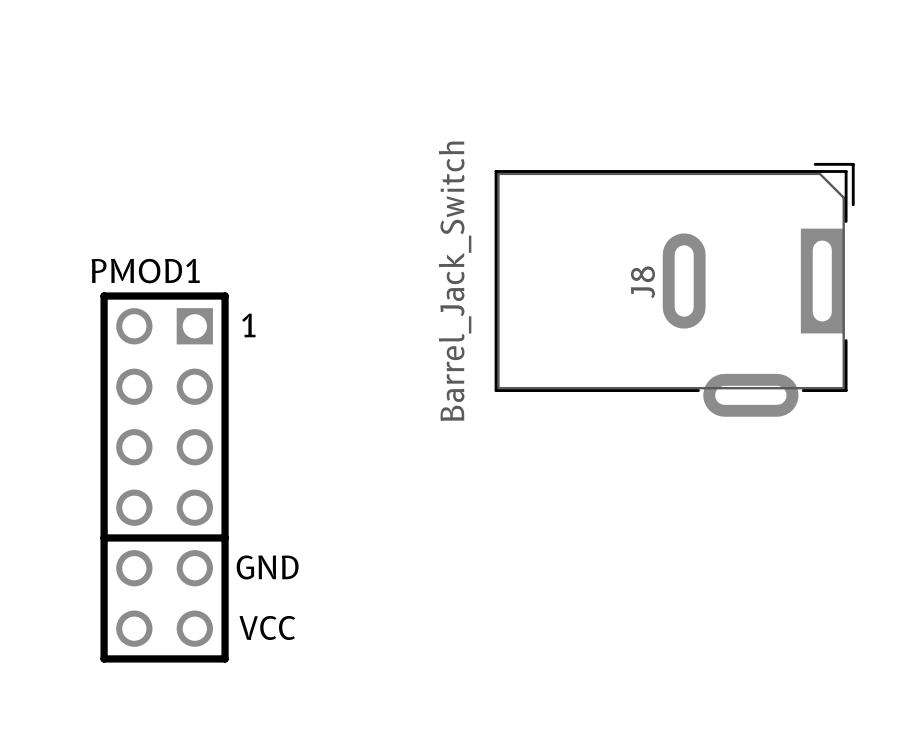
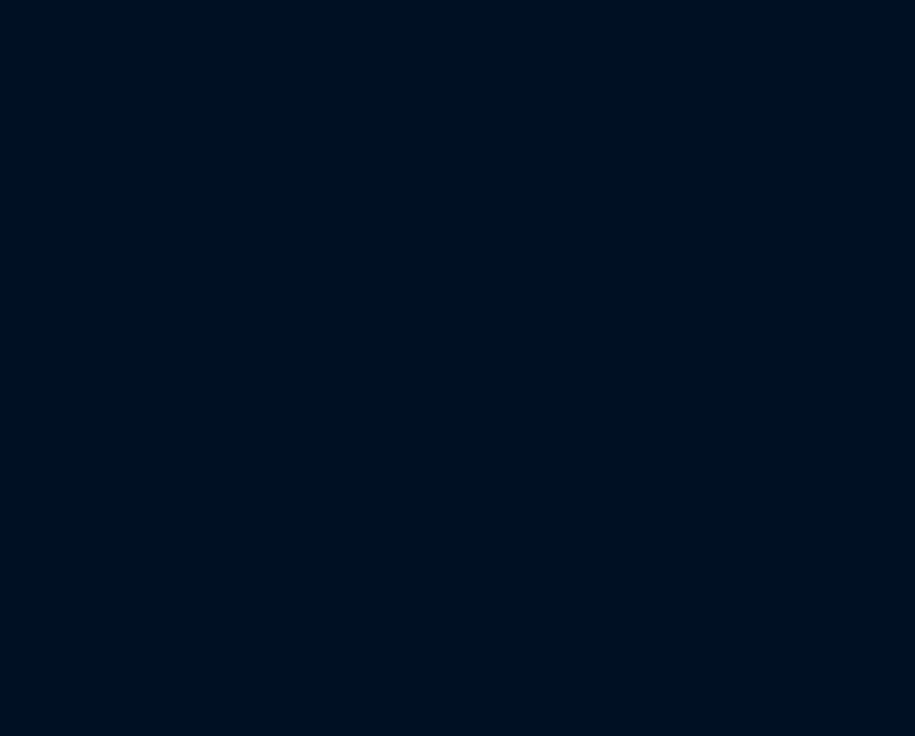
J8: Barrel_Jack_Switch (674, 289) -> none
PMOD1: (164, 477) -> none

